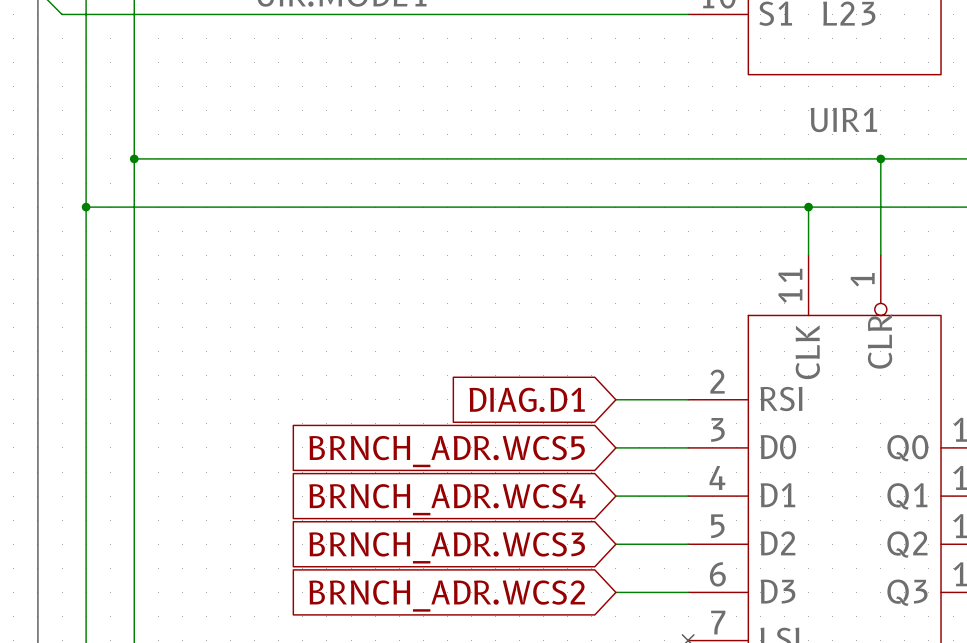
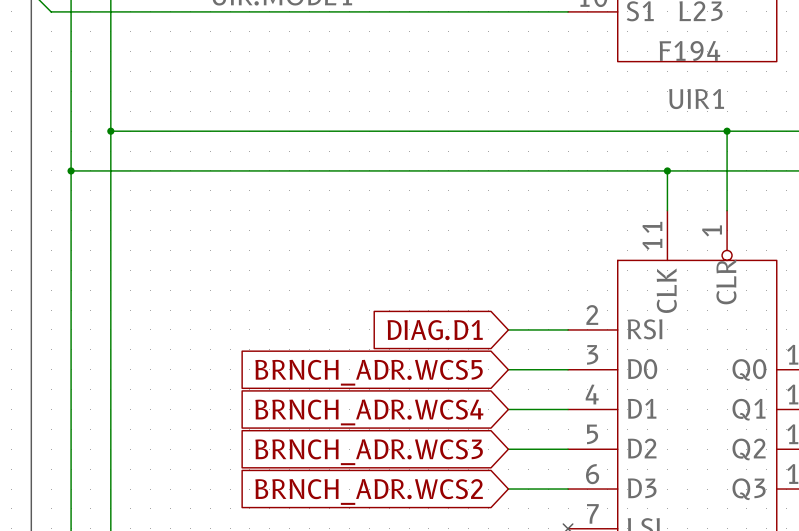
part value: none -> F194 (689, 51)

